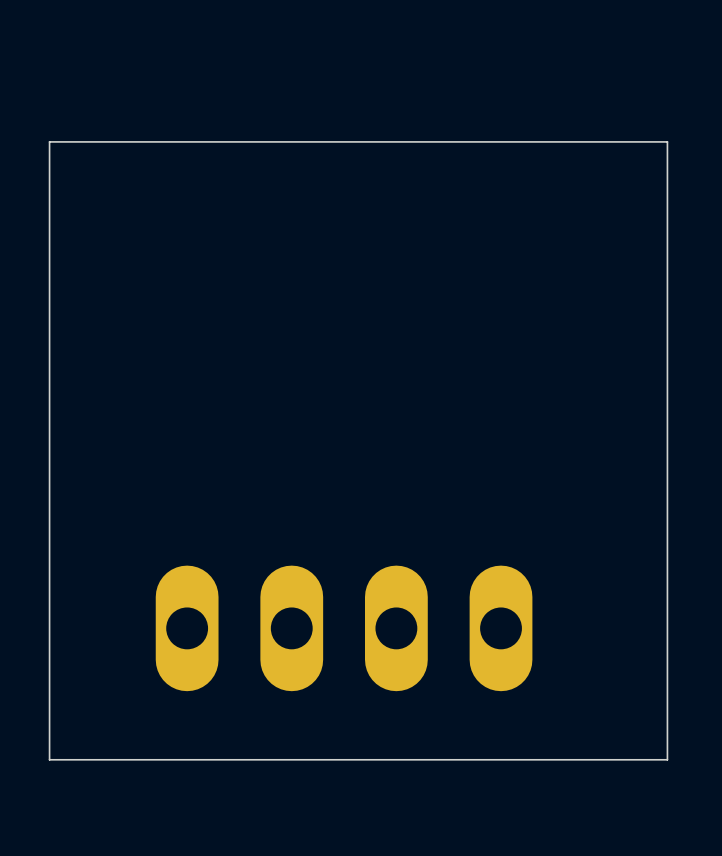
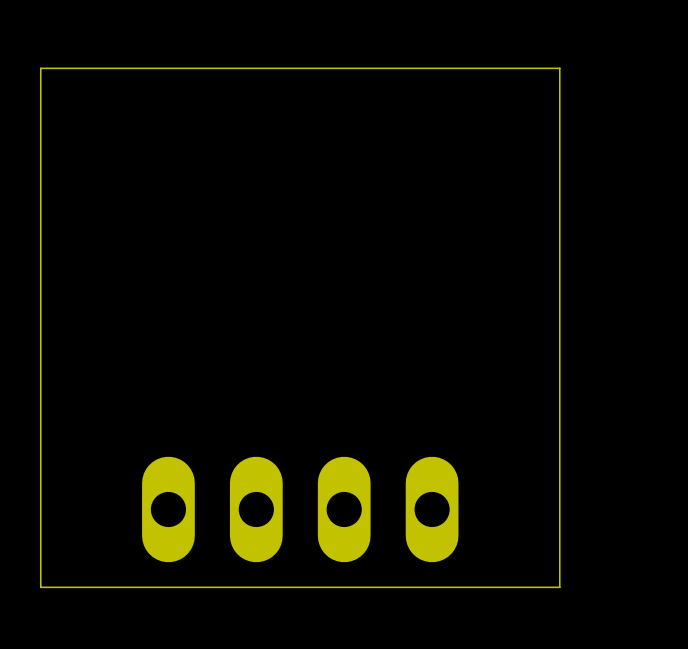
part position: (344, 628) -> (300, 509)

